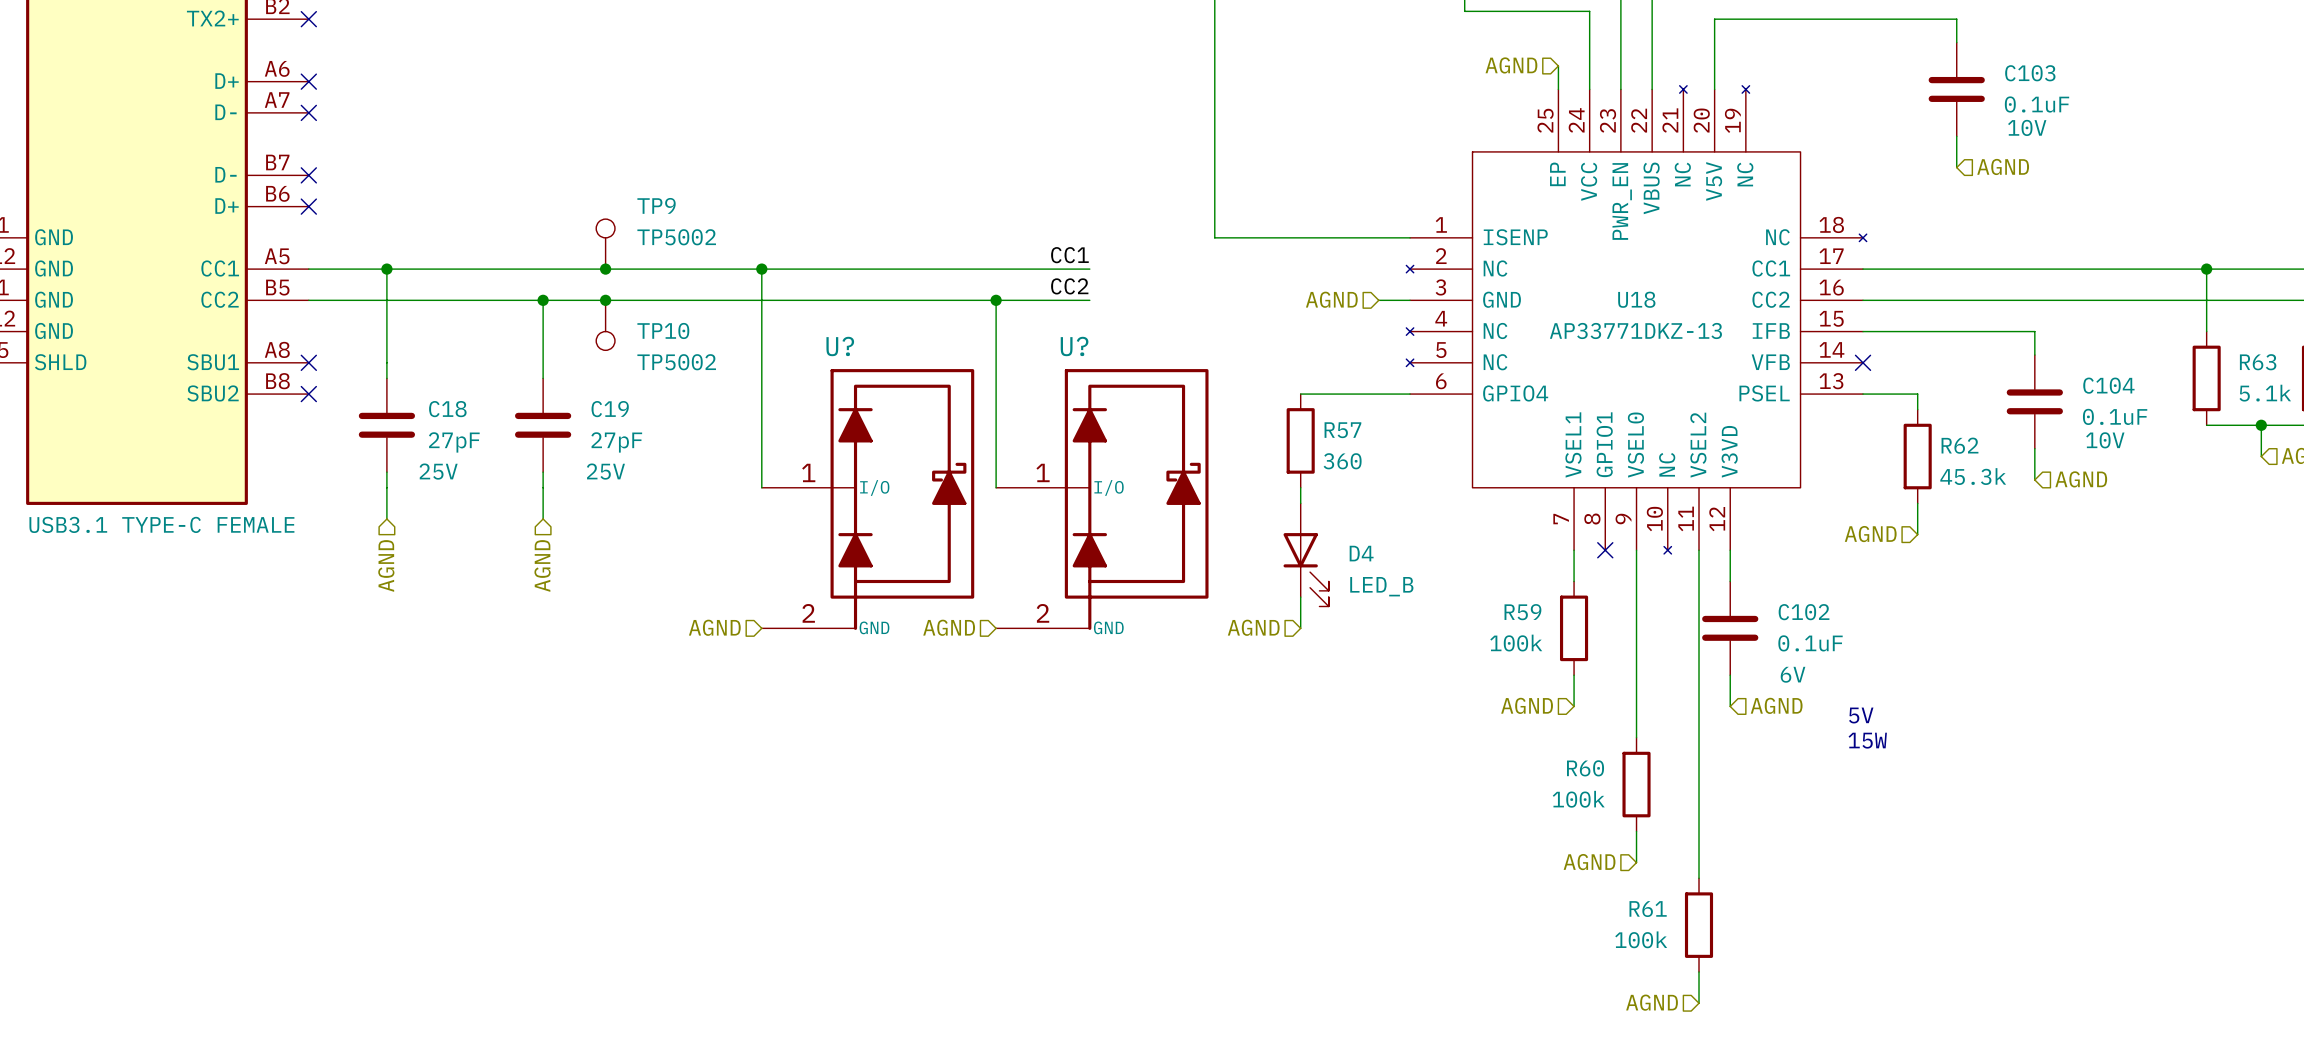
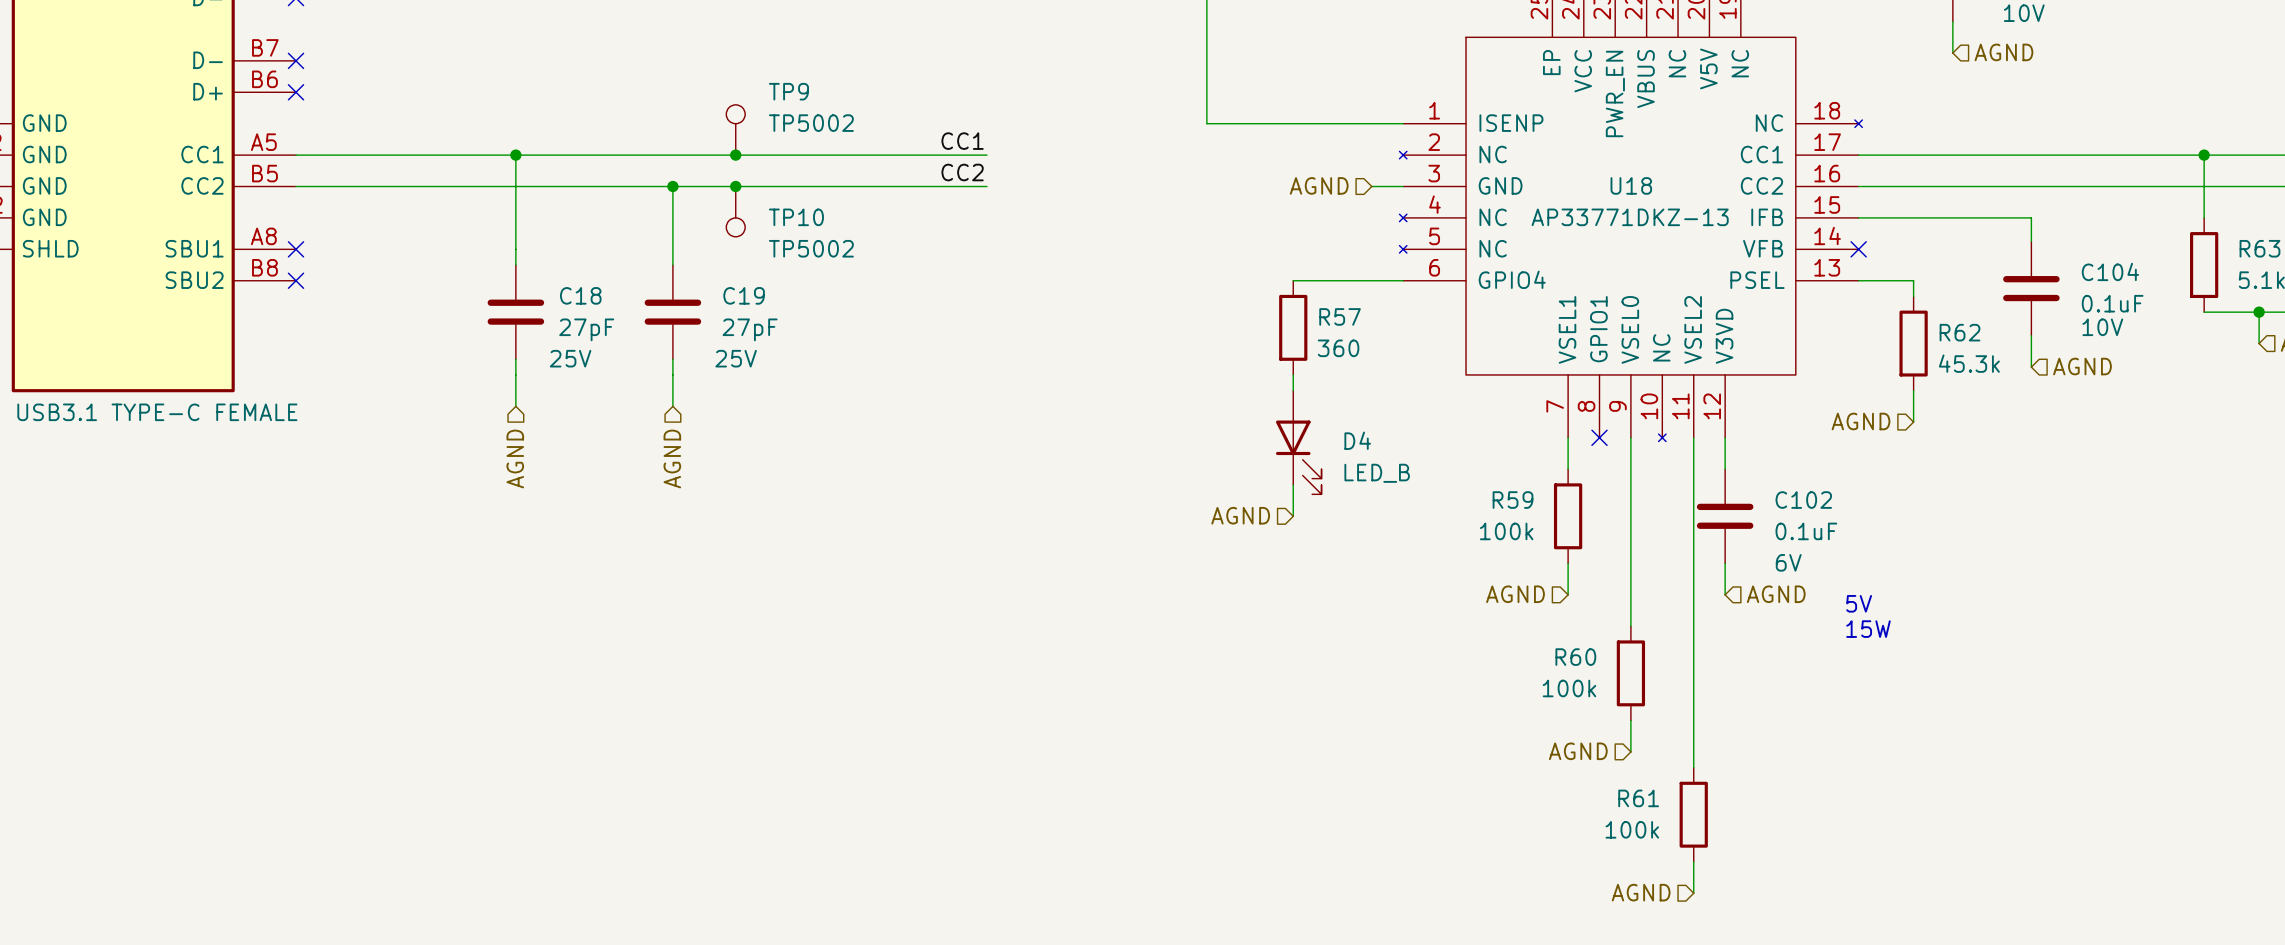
TP9 position: (605, 244) -> (735, 129)
label position: CC1 (1069, 255) -> CC1 (962, 141)
wire: (386, 269) (386, 378) -> (515, 155) (515, 265)
junction: (386, 269) -> none
junction: (605, 269) -> none
wire: (761, 269) (761, 487) -> none
junction position: (761, 269) -> (735, 155)
wire: (996, 269) (1089, 269) -> none
label position: CC2 (1069, 286) -> CC2 (962, 172)
wire: (543, 300) (543, 378) -> (672, 186) (672, 265)
junction position: (543, 300) -> (515, 155)
junction: (605, 300) -> none
junction: none -> (672, 186)
junction: none -> (735, 186)
junction: (996, 300) -> none
wire: (1089, 300) (996, 300) (996, 487) -> none
TP10 position: (605, 325) -> (735, 211)
C18 position: (386, 425) -> (515, 312)
C19 position: (543, 425) -> (672, 312)
wire: (386, 472) (386, 519) -> (515, 359) (515, 406)
wire: (543, 472) (543, 519) -> (672, 359) (672, 406)
U?: (868, 499) -> none
U?: (1102, 499) -> none
hierarchical label: AGND (386, 565) -> none
hierarchical label position: AGND (542, 565) -> AGND (515, 458)
hierarchical label rotation: 0° (714, 627) -> 90° counterclockwise (672, 458)
hierarchical label: AGND (949, 627) -> none

